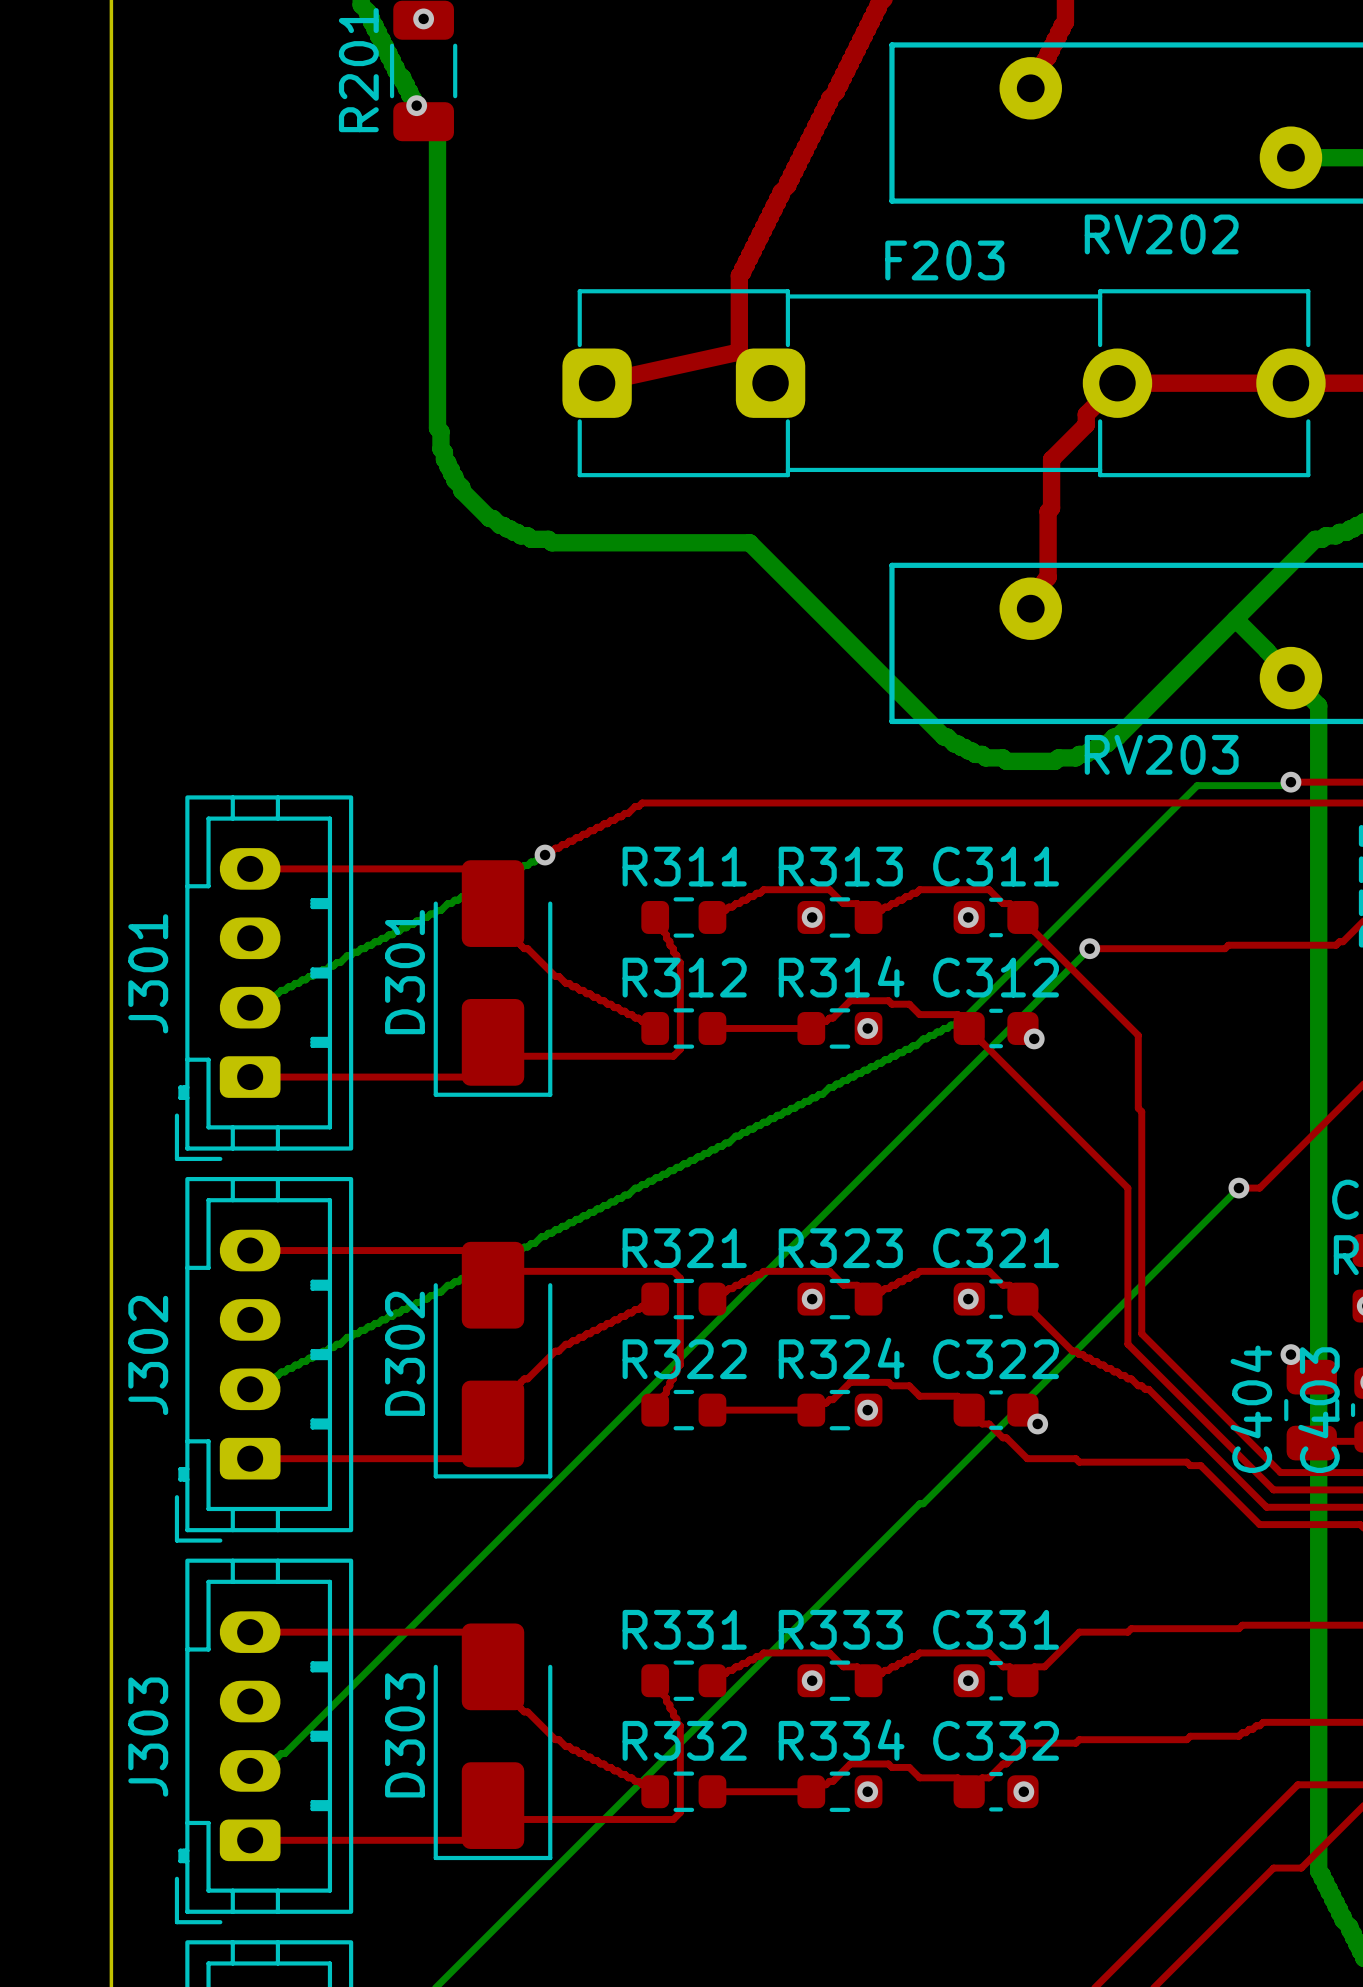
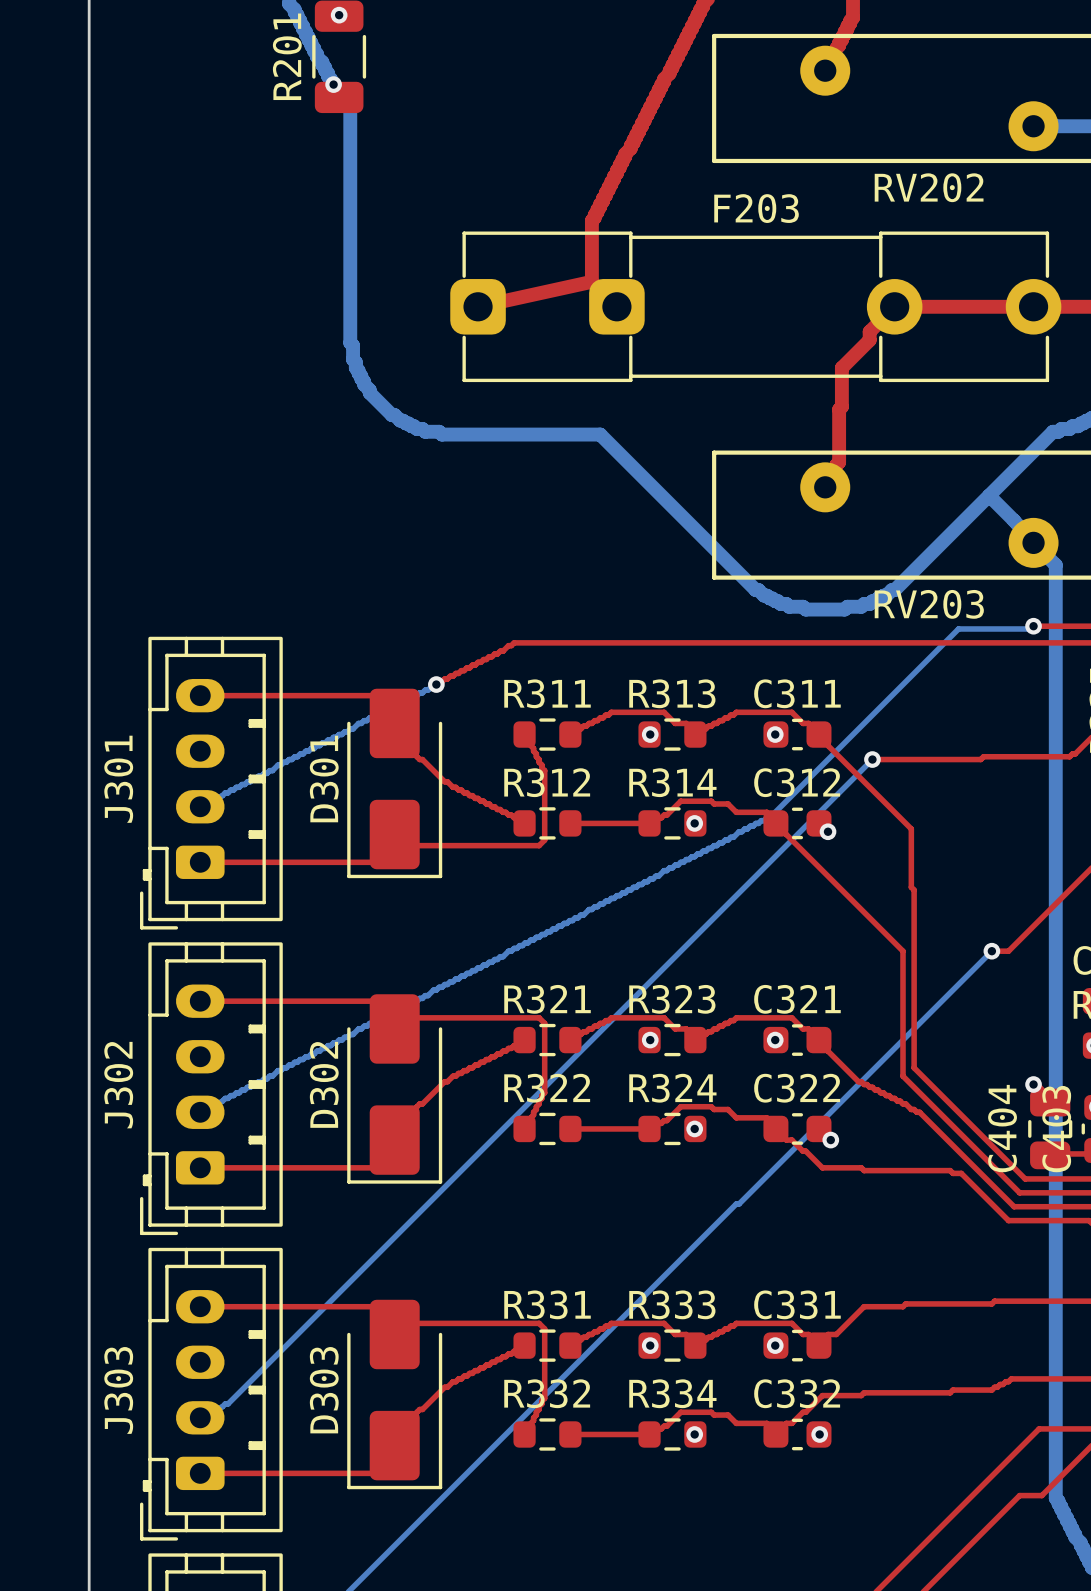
top track: (493, 1666) (520, 1708) (524, 1711) (527, 1711) (555, 1739) (558, 1739) (572, 1750) (645, 1784) (655, 1791) -> (394, 1334) (416, 1323) (539, 1323) (544, 1328) (544, 1381)
top track: (655, 1680) (680, 1725) -> none
top track: (680, 1746) (680, 1812) (673, 1819) (520, 1819) (493, 1805) -> (524, 1345) (444, 1387) (422, 1409) (416, 1412) (394, 1445)
top track: none -> (544, 1398) (524, 1434)

